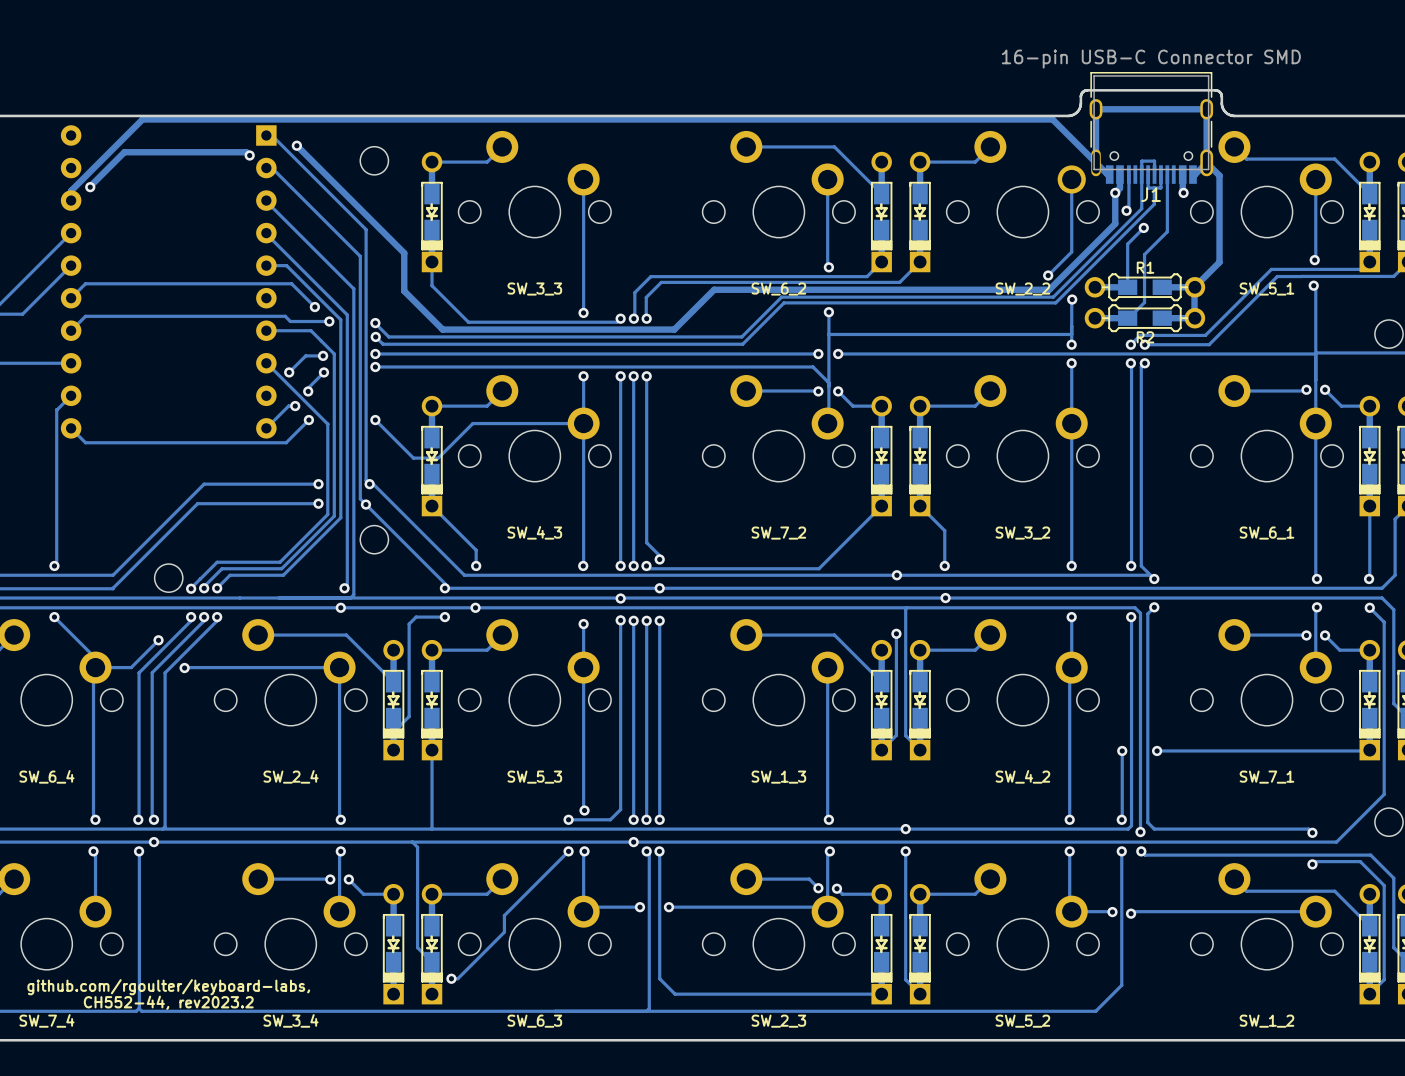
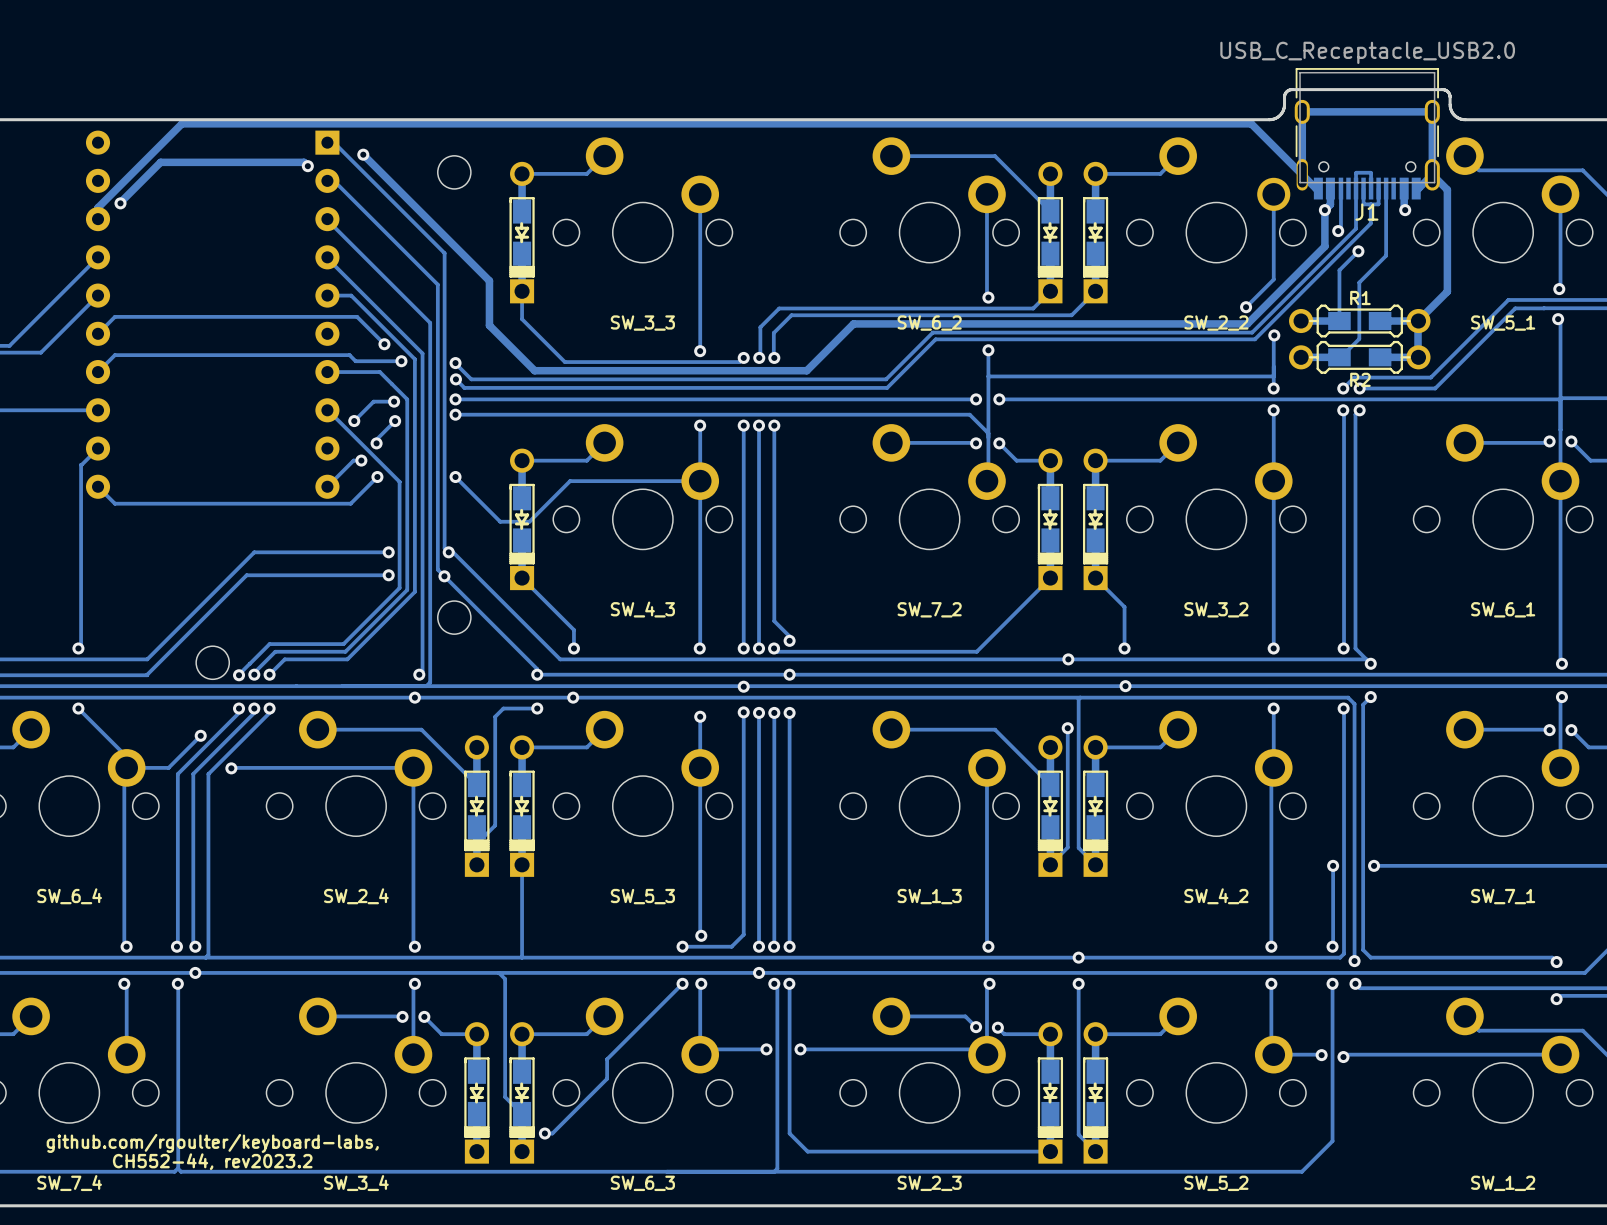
J1 value: 16-pin USB-C Connector SMD (1151, 59) -> USB_C_Receptacle_USB2.0 (1367, 52)

